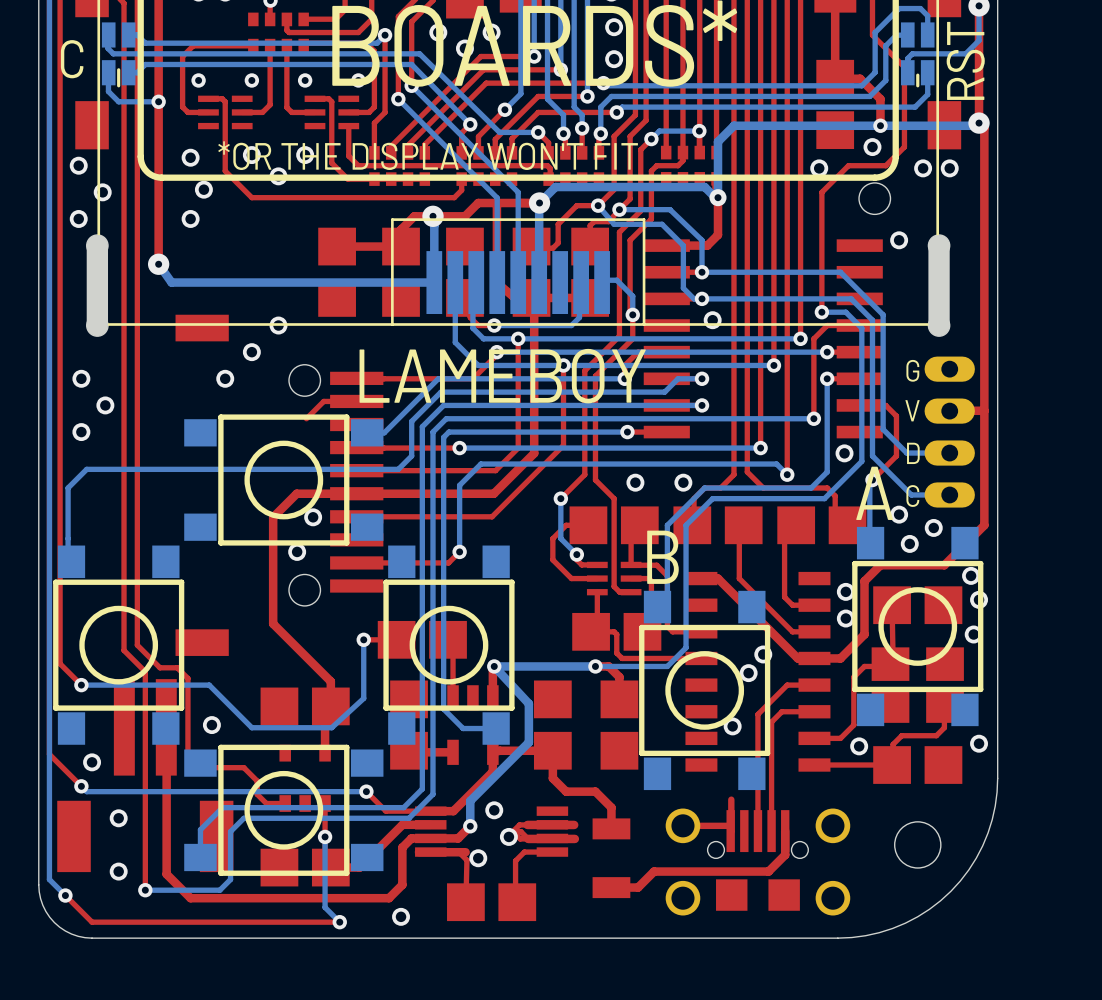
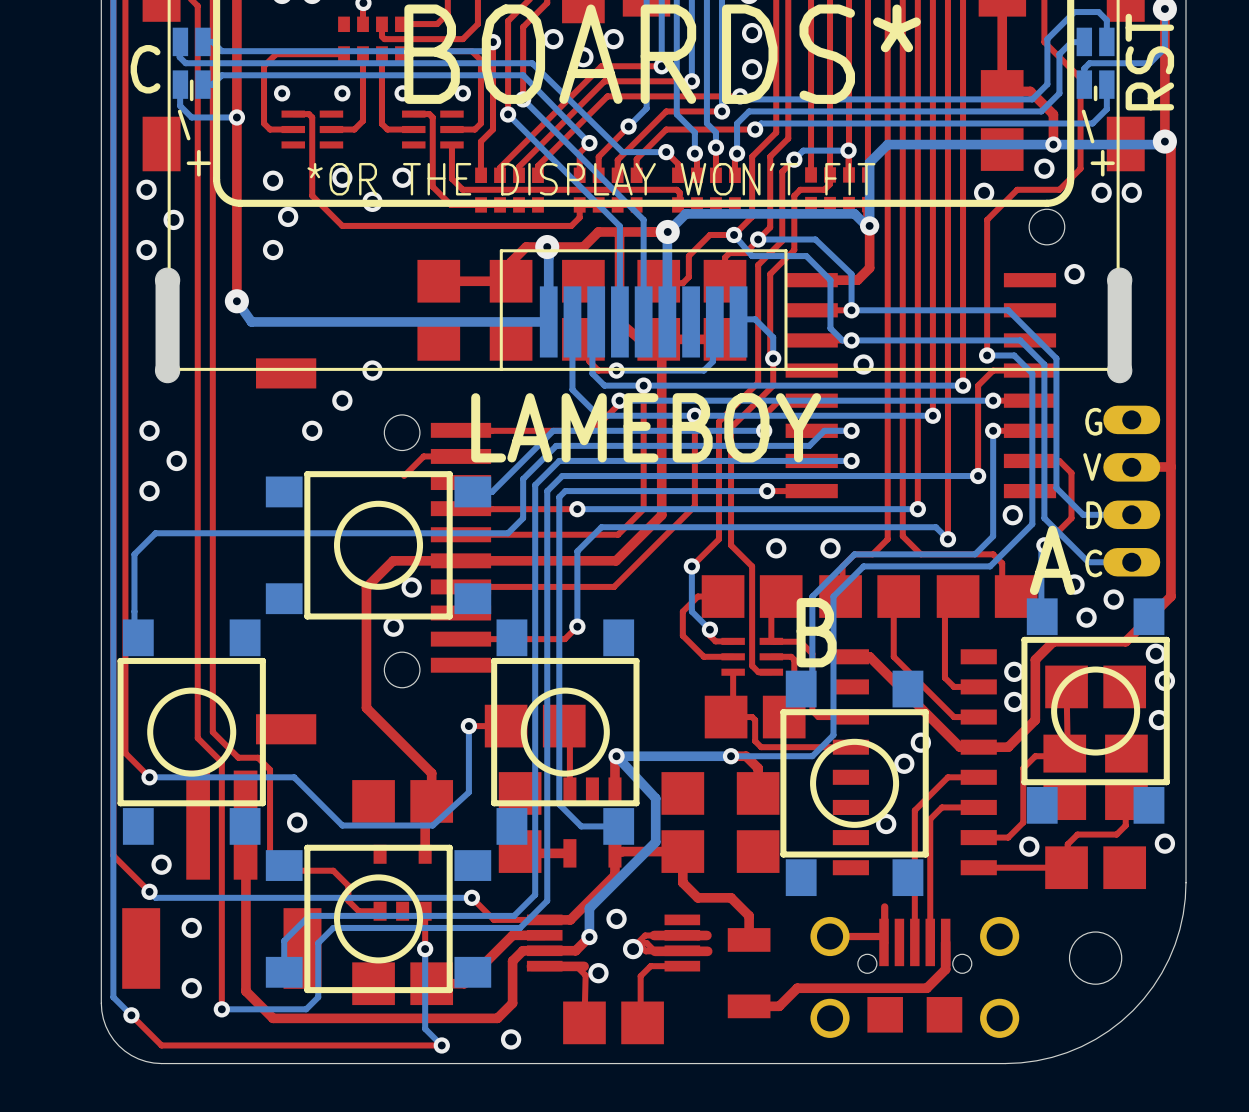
line: none -> (179, 111) (188, 138)
line: none -> (1083, 111) (1092, 141)
text: none -> + (198, 163)
text: none -> + (1102, 163)

